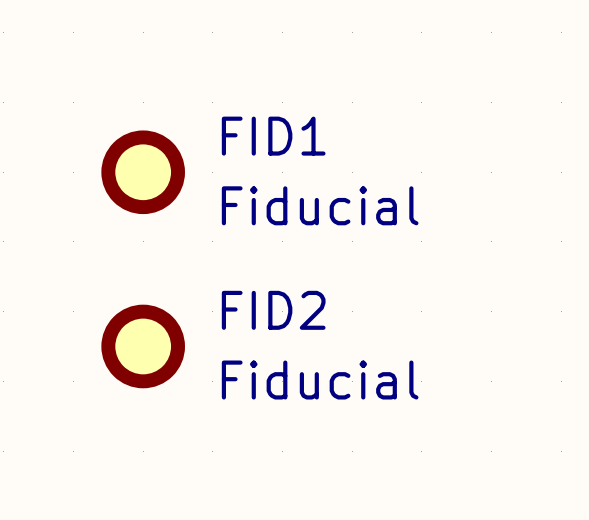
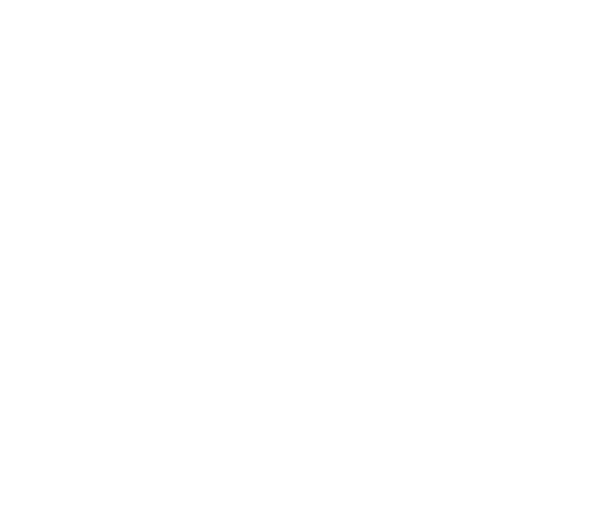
FID1: Fiducial (143, 172) -> none
FID2: Fiducial (143, 346) -> none

